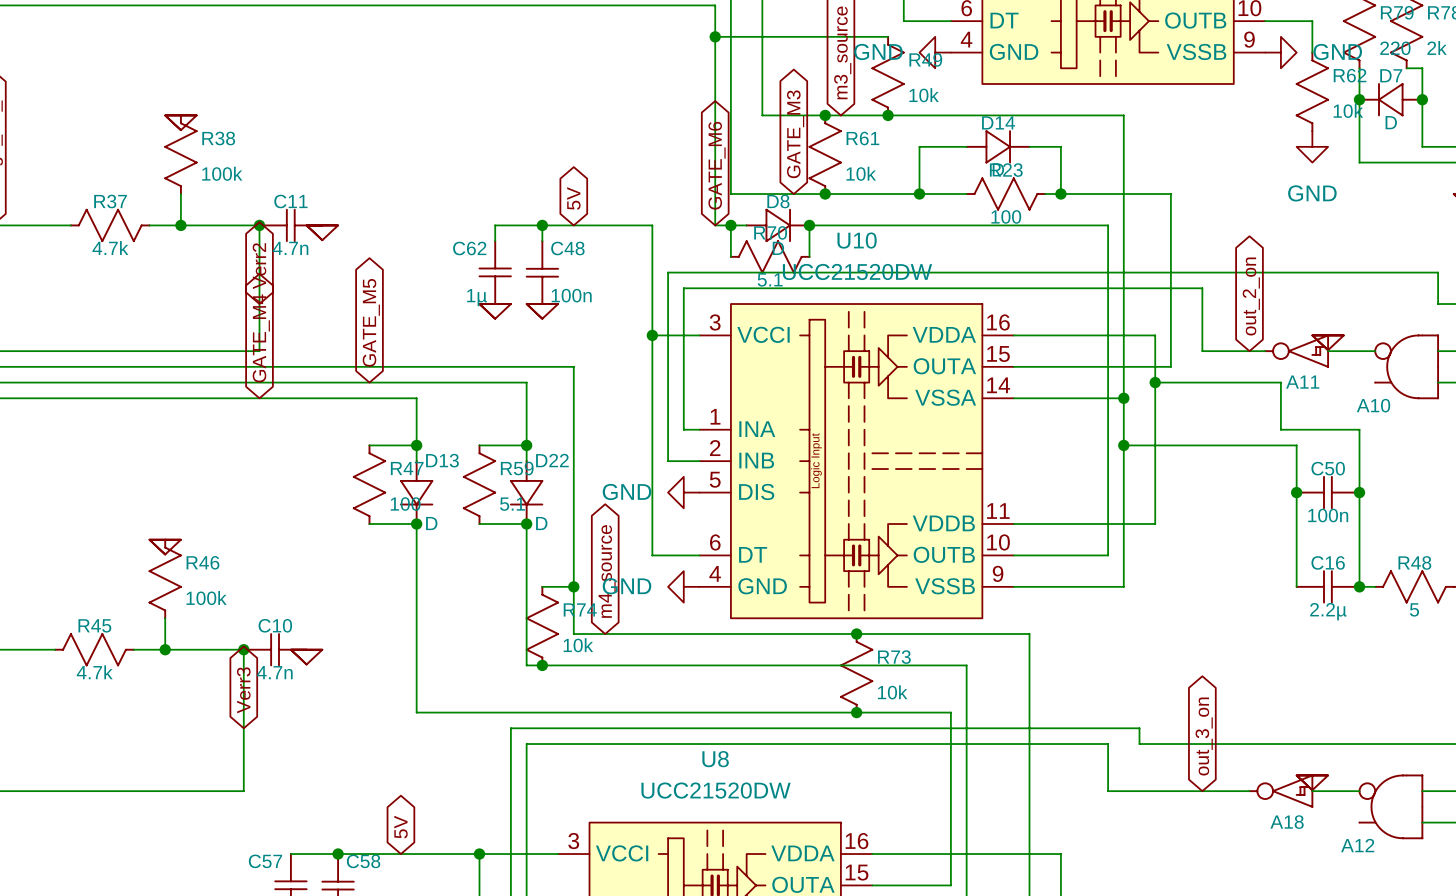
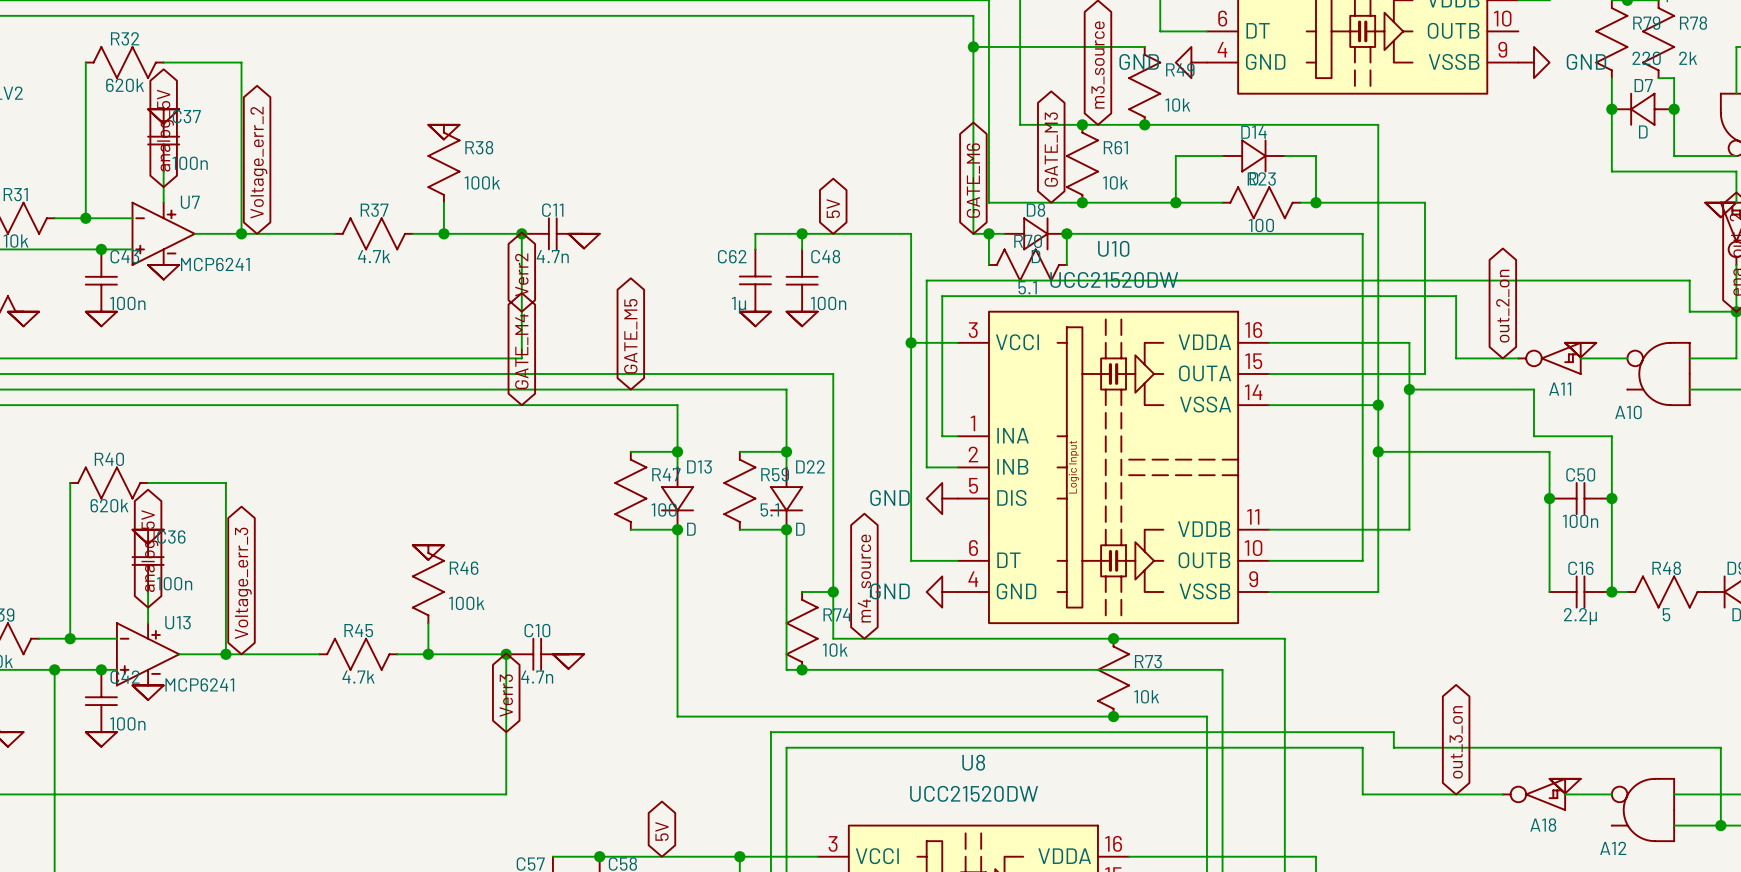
wire: (1265, 21) (1312, 21) (1312, 52) -> none
R62: 10k (1312, 91) -> none
power symbol: GND (1312, 146) -> none

